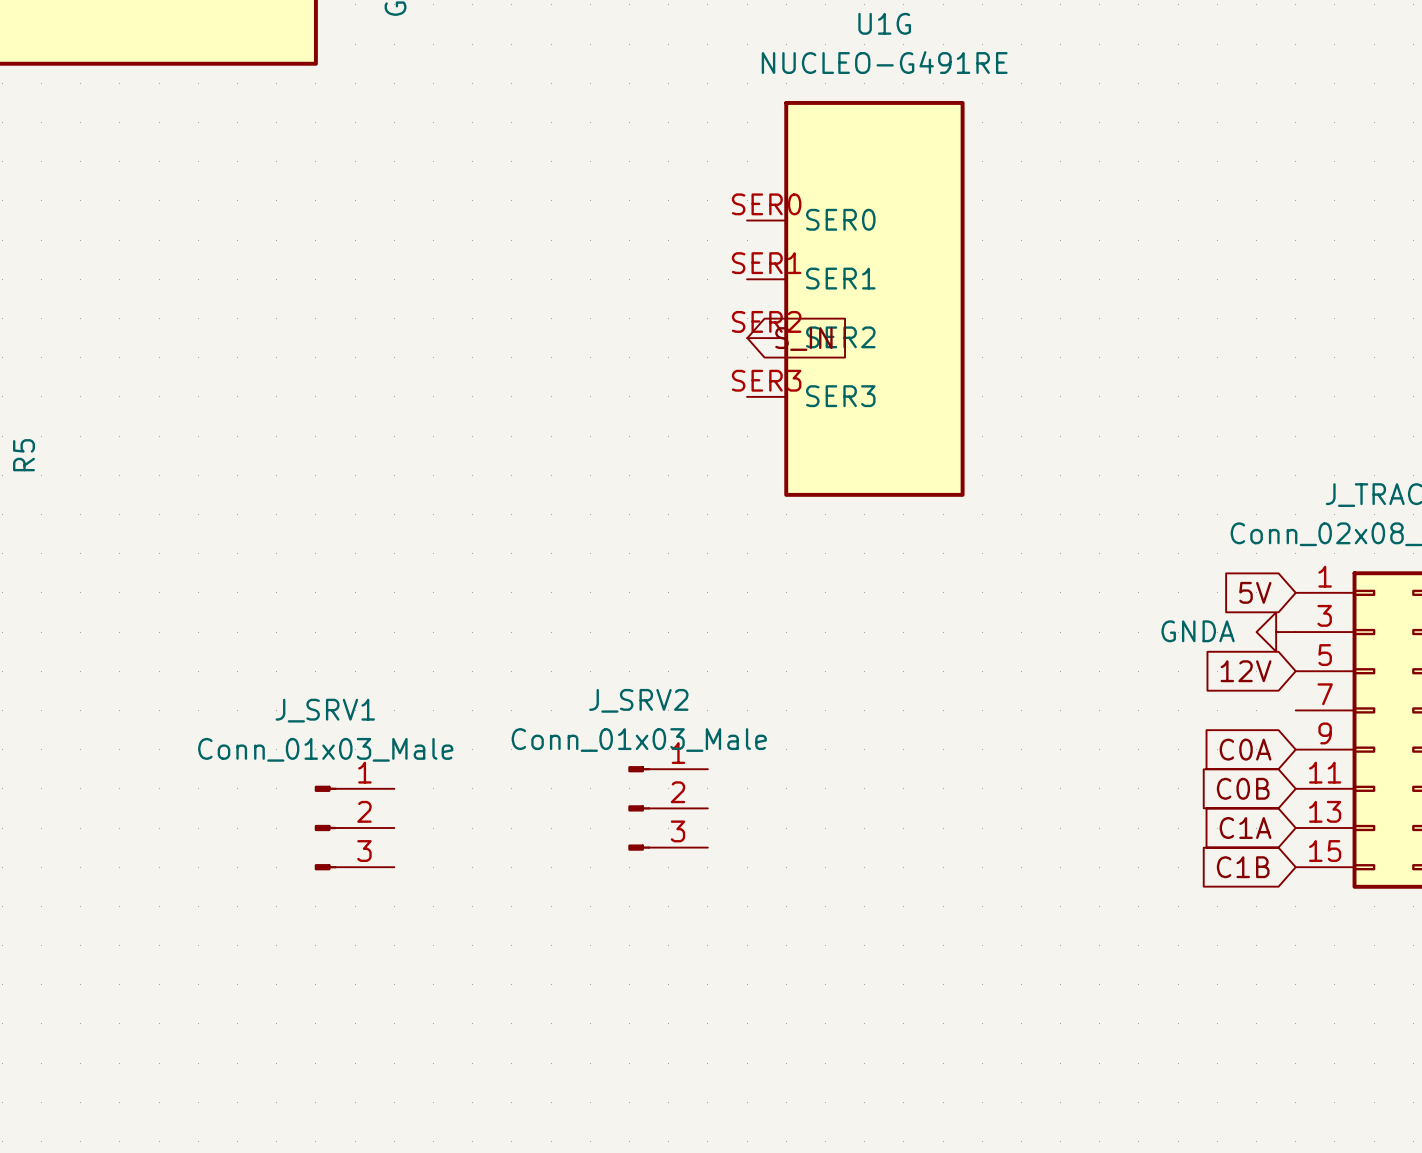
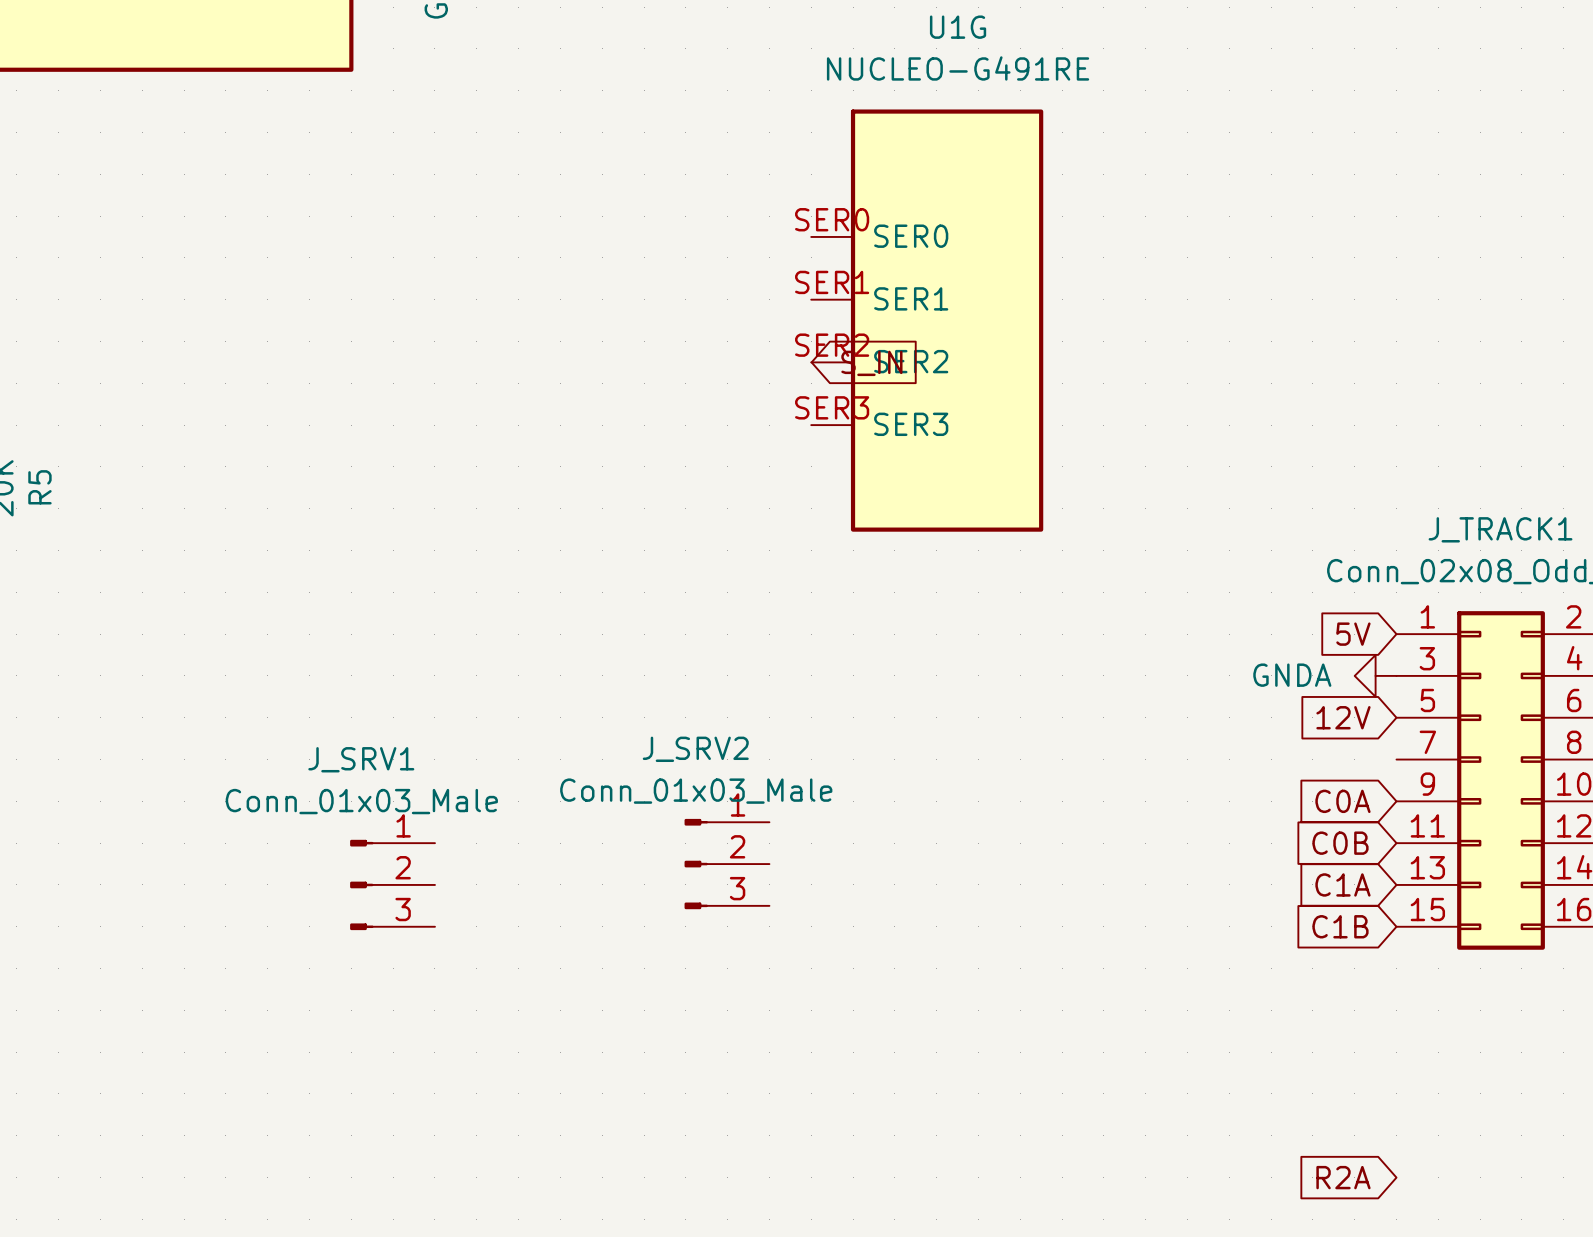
global label: none -> R2A (1343, 1177)

